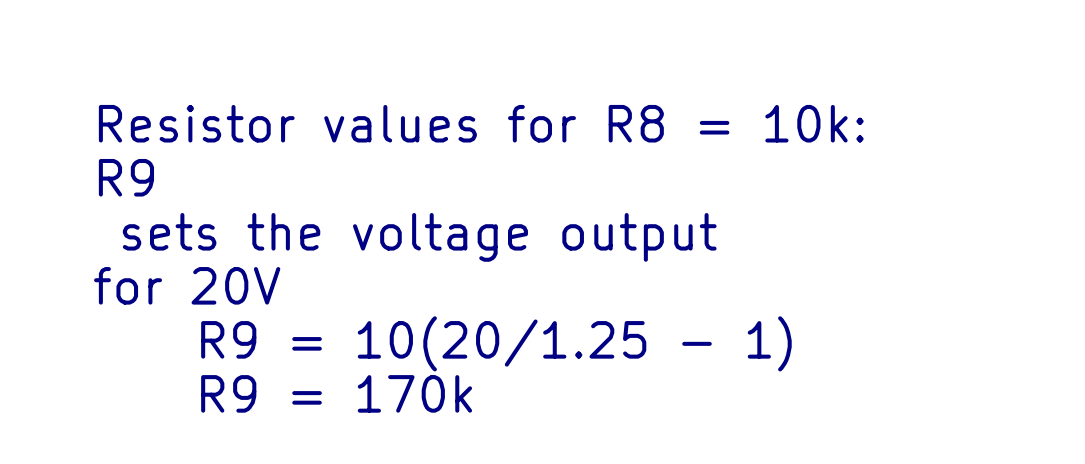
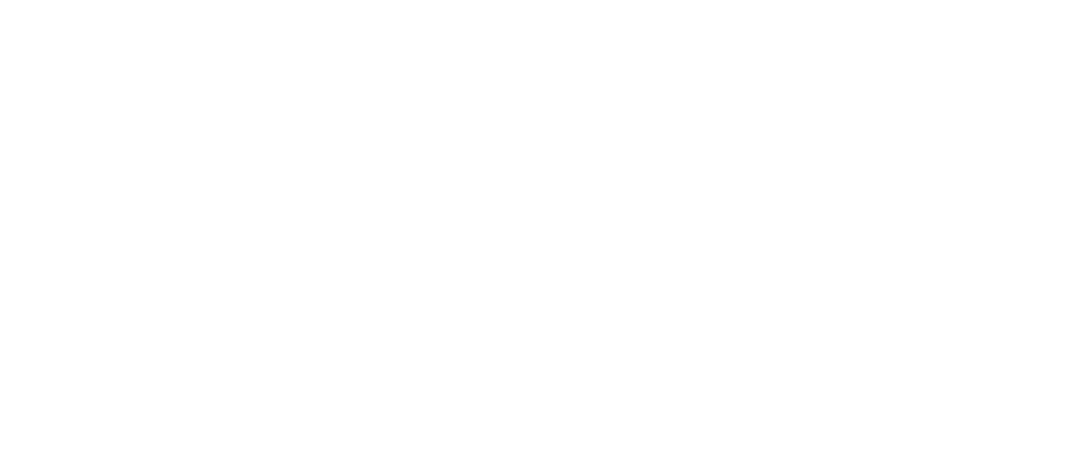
text: Resistor values for R8 = 10k: (481, 123) -> none
text: R9 (126, 177) -> none
text: sets the voltage output (419, 237) -> none
text: for 20V (187, 285) -> none
text: R9 = 10(20/1.25 - 1) (496, 343) -> none
text: R9 = 170k (336, 393) -> none

